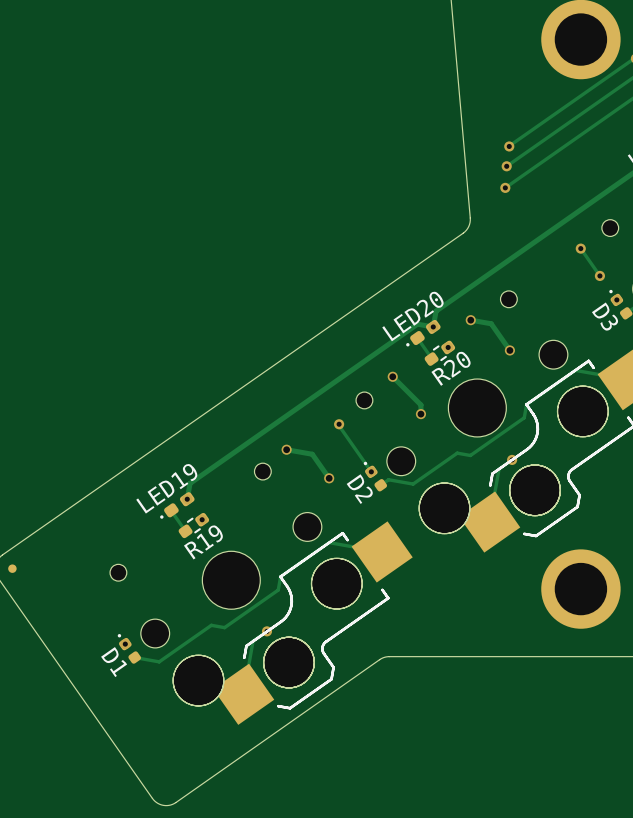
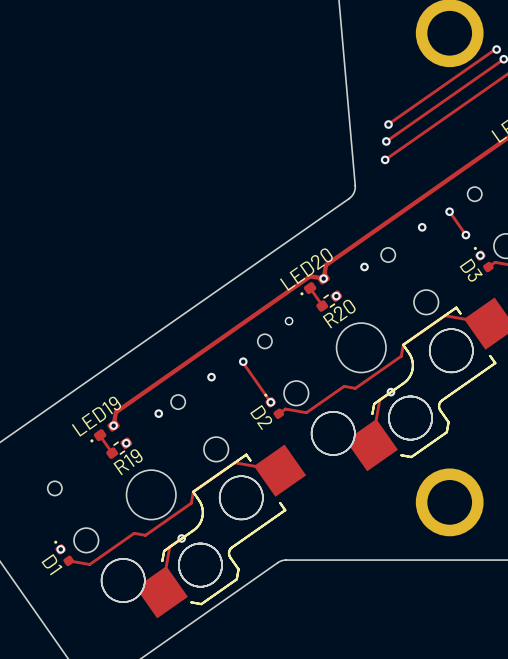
via: none -> (422, 227)
via: none -> (364, 266)
track: (470, 320) (491, 323) (509, 350) -> none
via: (470, 320) -> none
via: (509, 350) -> none
track: (392, 376) (420, 404) (420, 414) -> none
via: (420, 414) -> none
via: none -> (211, 377)
track: (286, 449) (312, 454) (329, 478) -> none
via: (286, 449) -> none
via: (329, 478) -> none
via: none -> (158, 413)

